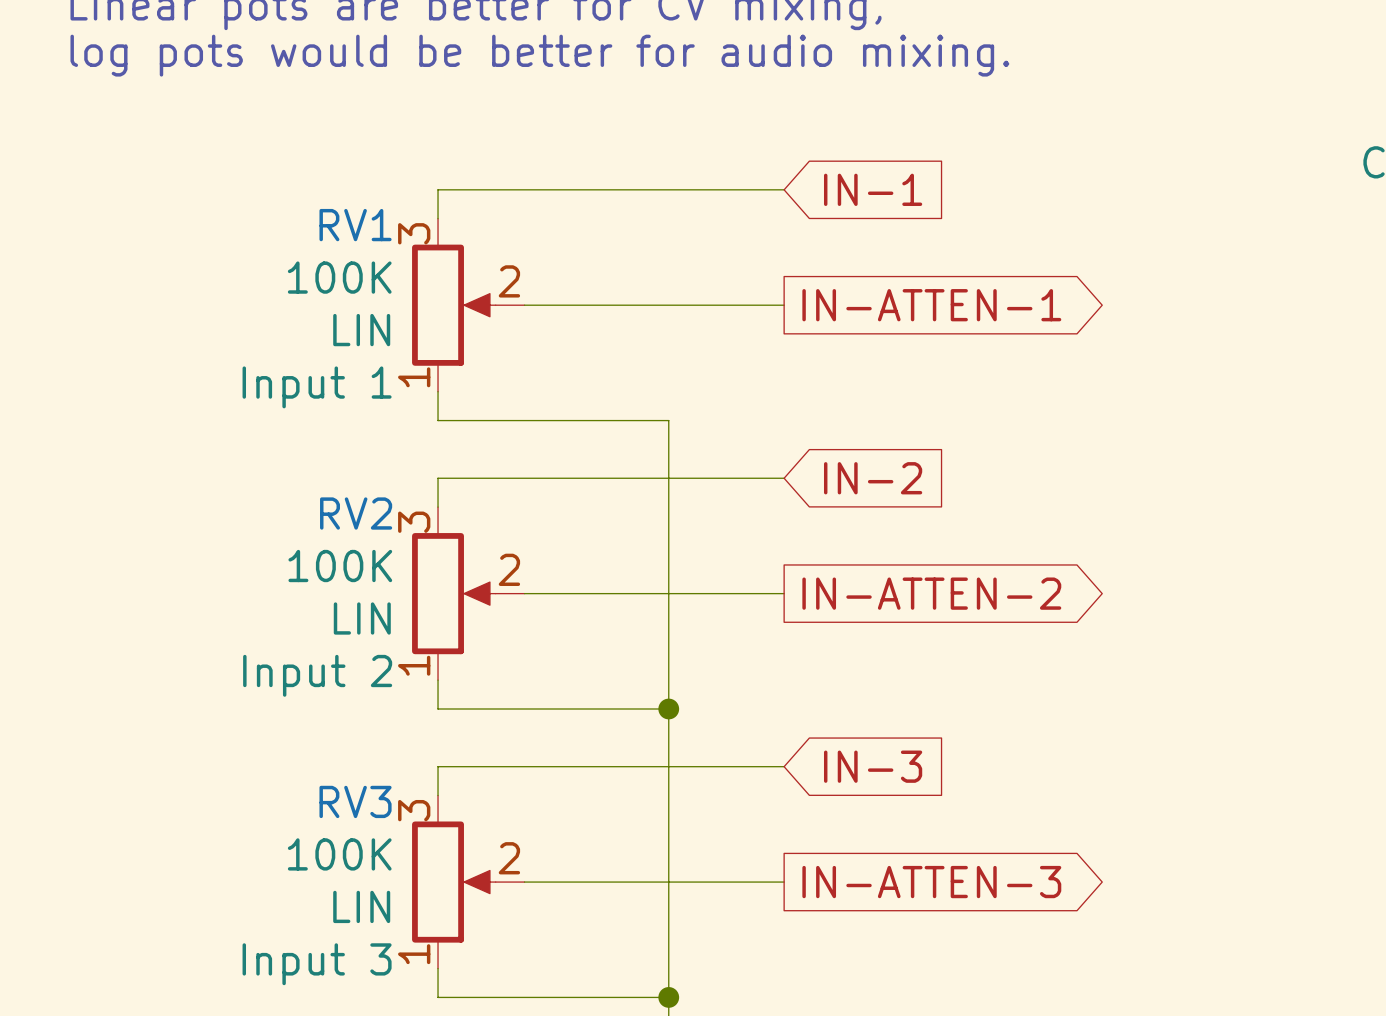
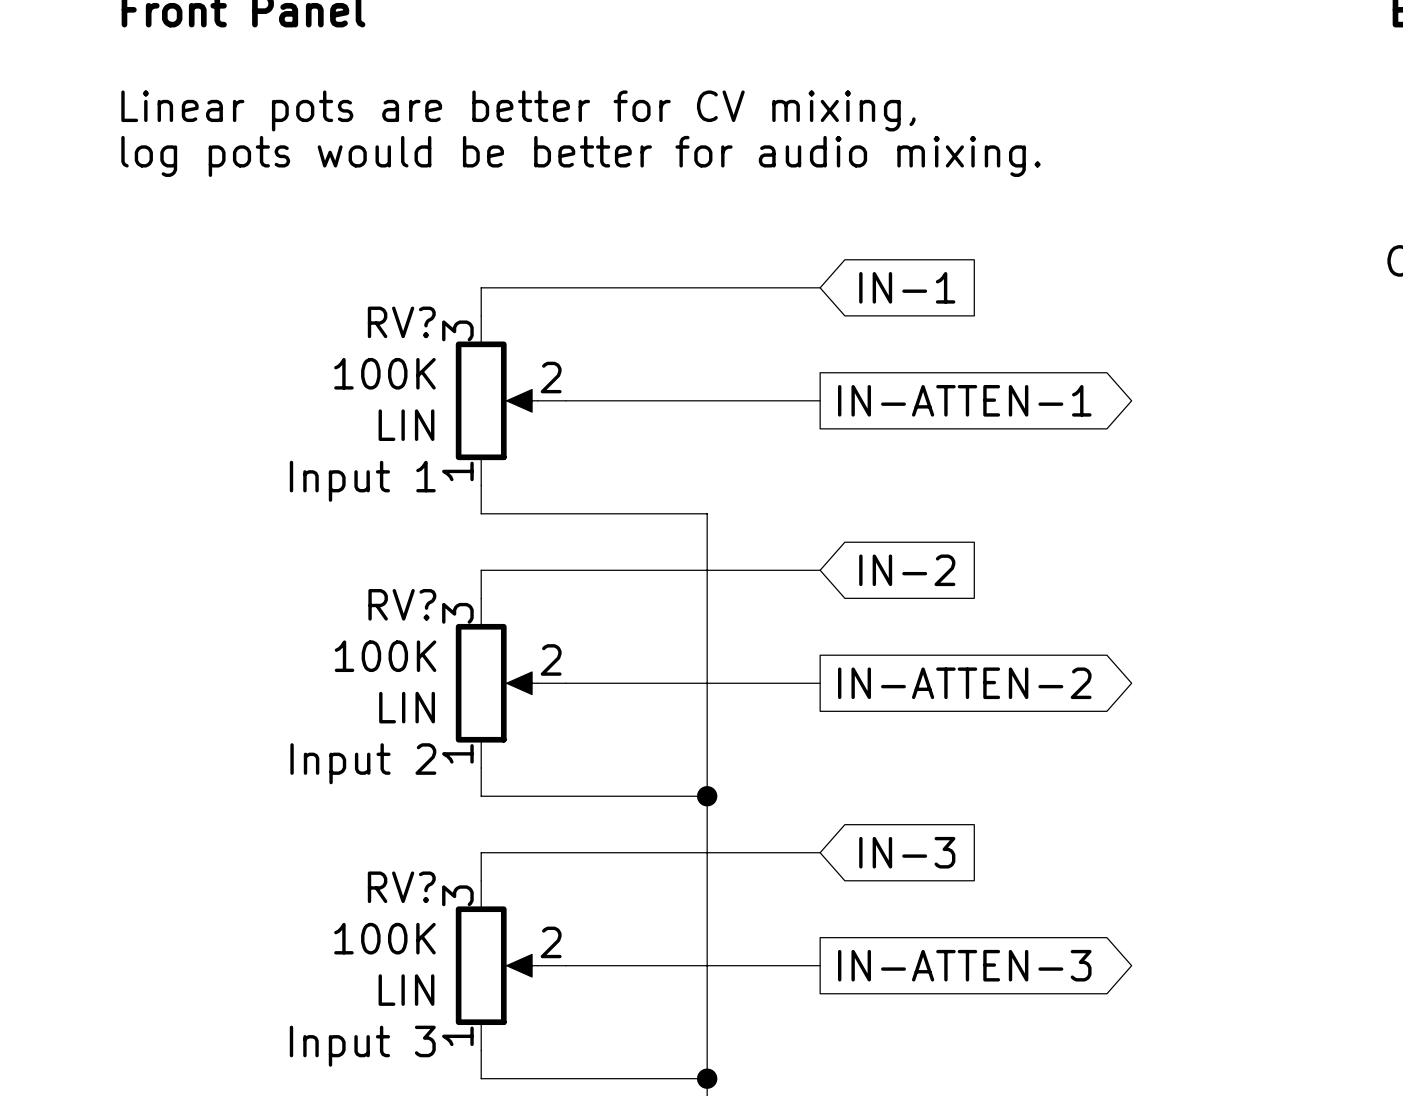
RV1 name: RV1 (355, 225) -> RV? (401, 322)
RV2 name: RV2 (356, 513) -> RV? (402, 604)
RV3 name: RV3 (355, 801) -> RV? (401, 887)

